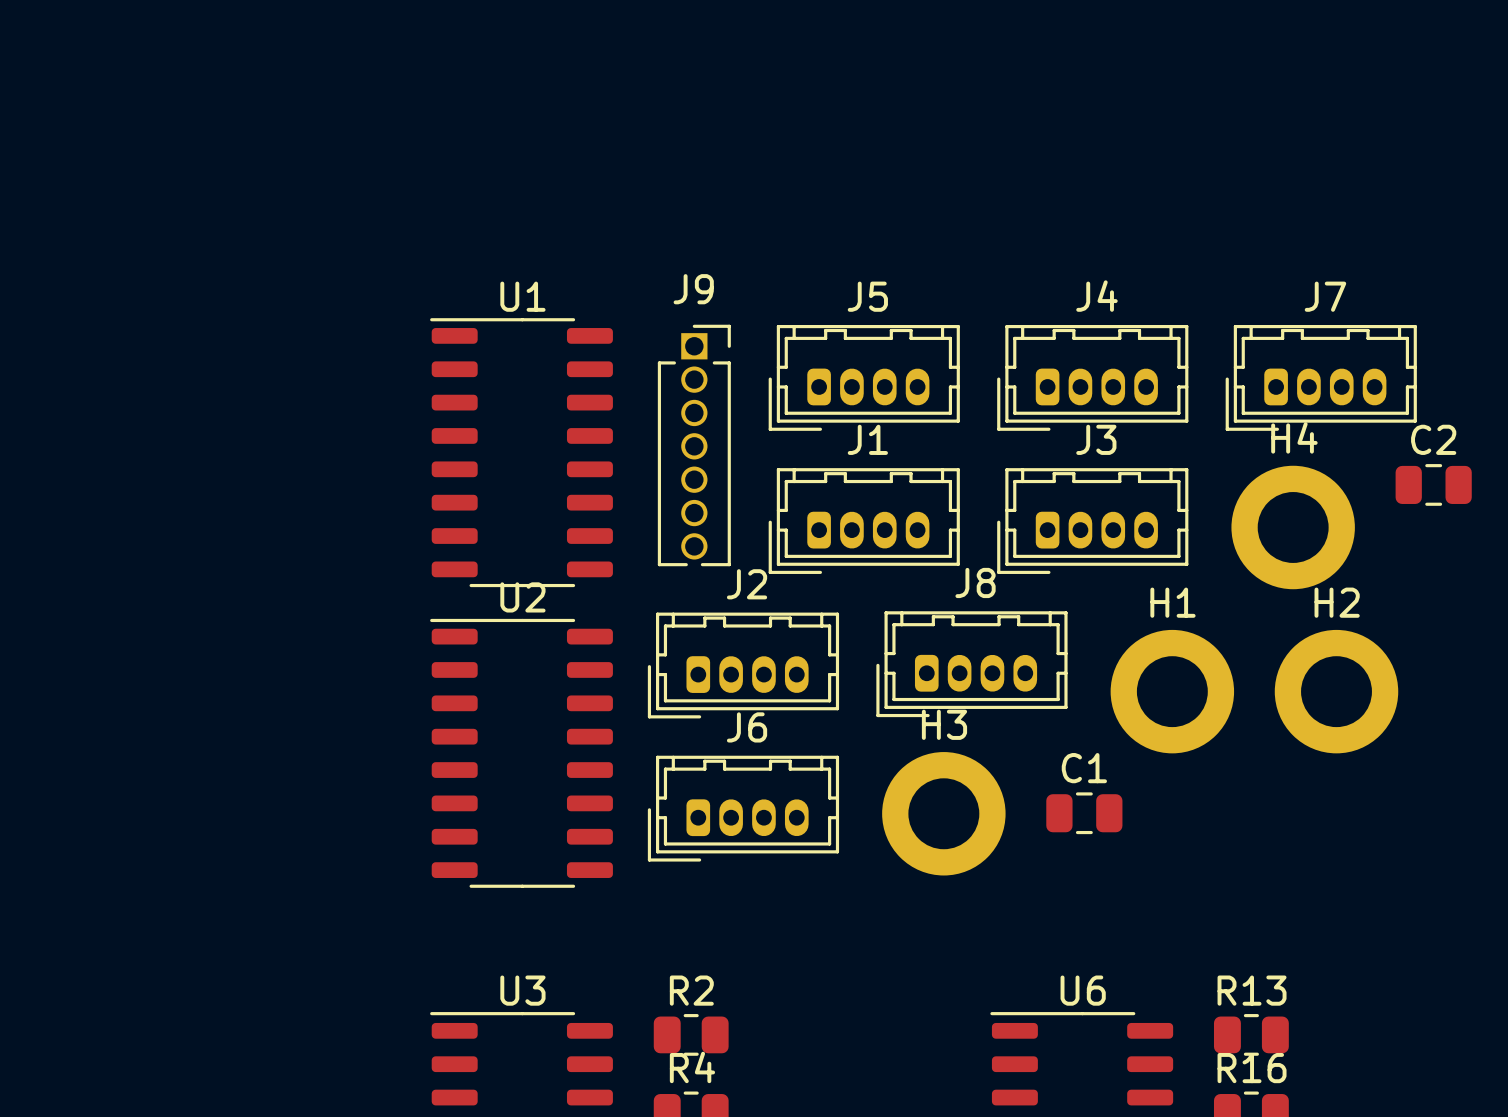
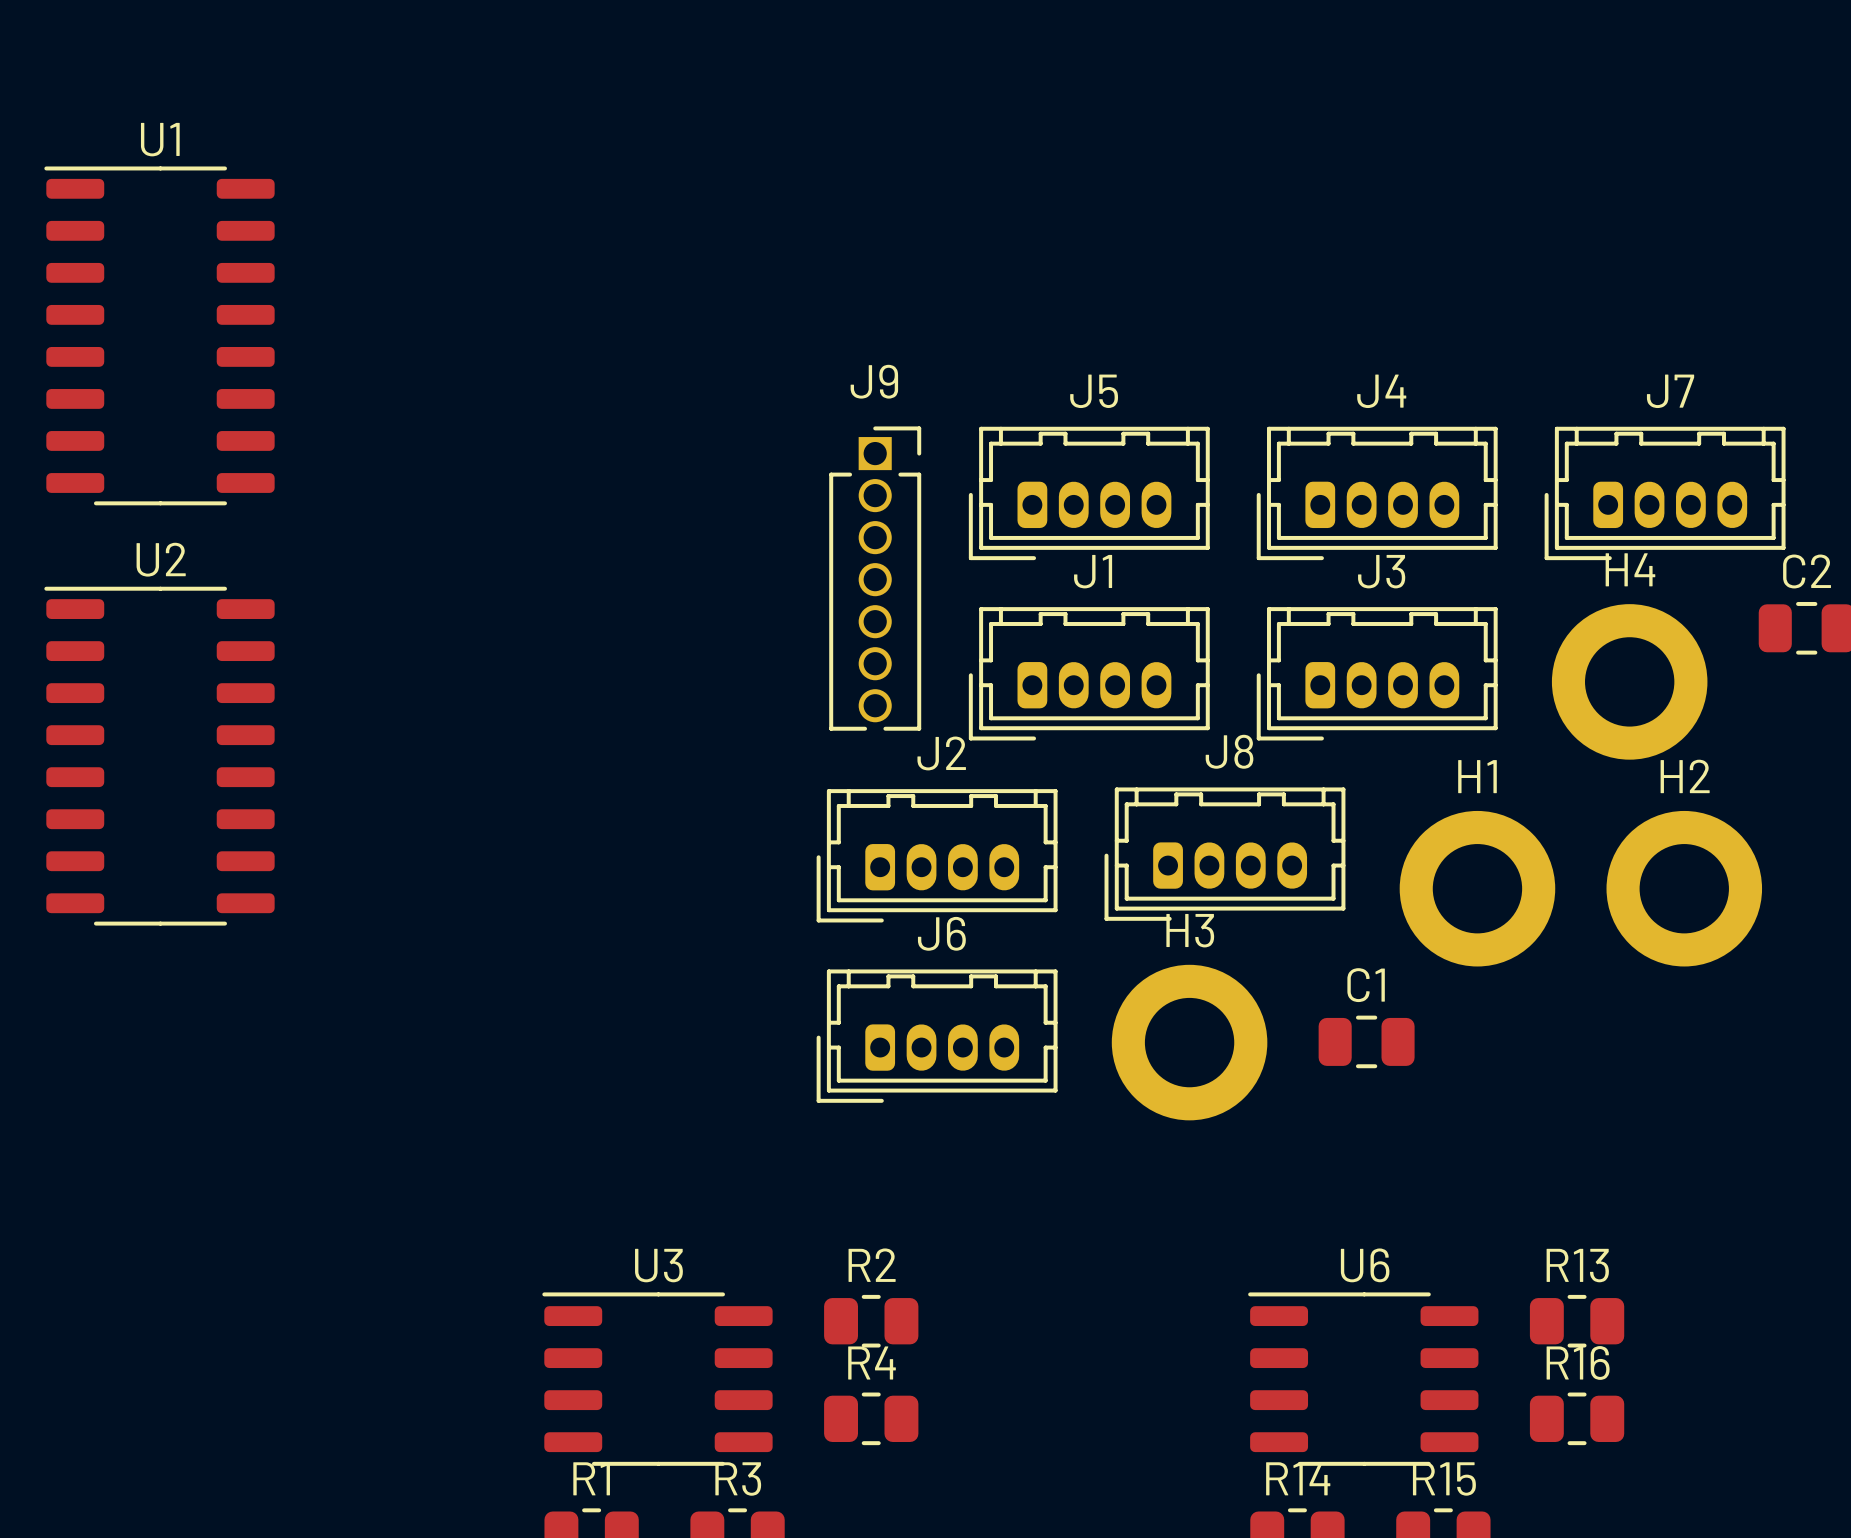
U1 position: (521, 452) -> (159, 335)
U2 position: (521, 753) -> (159, 756)

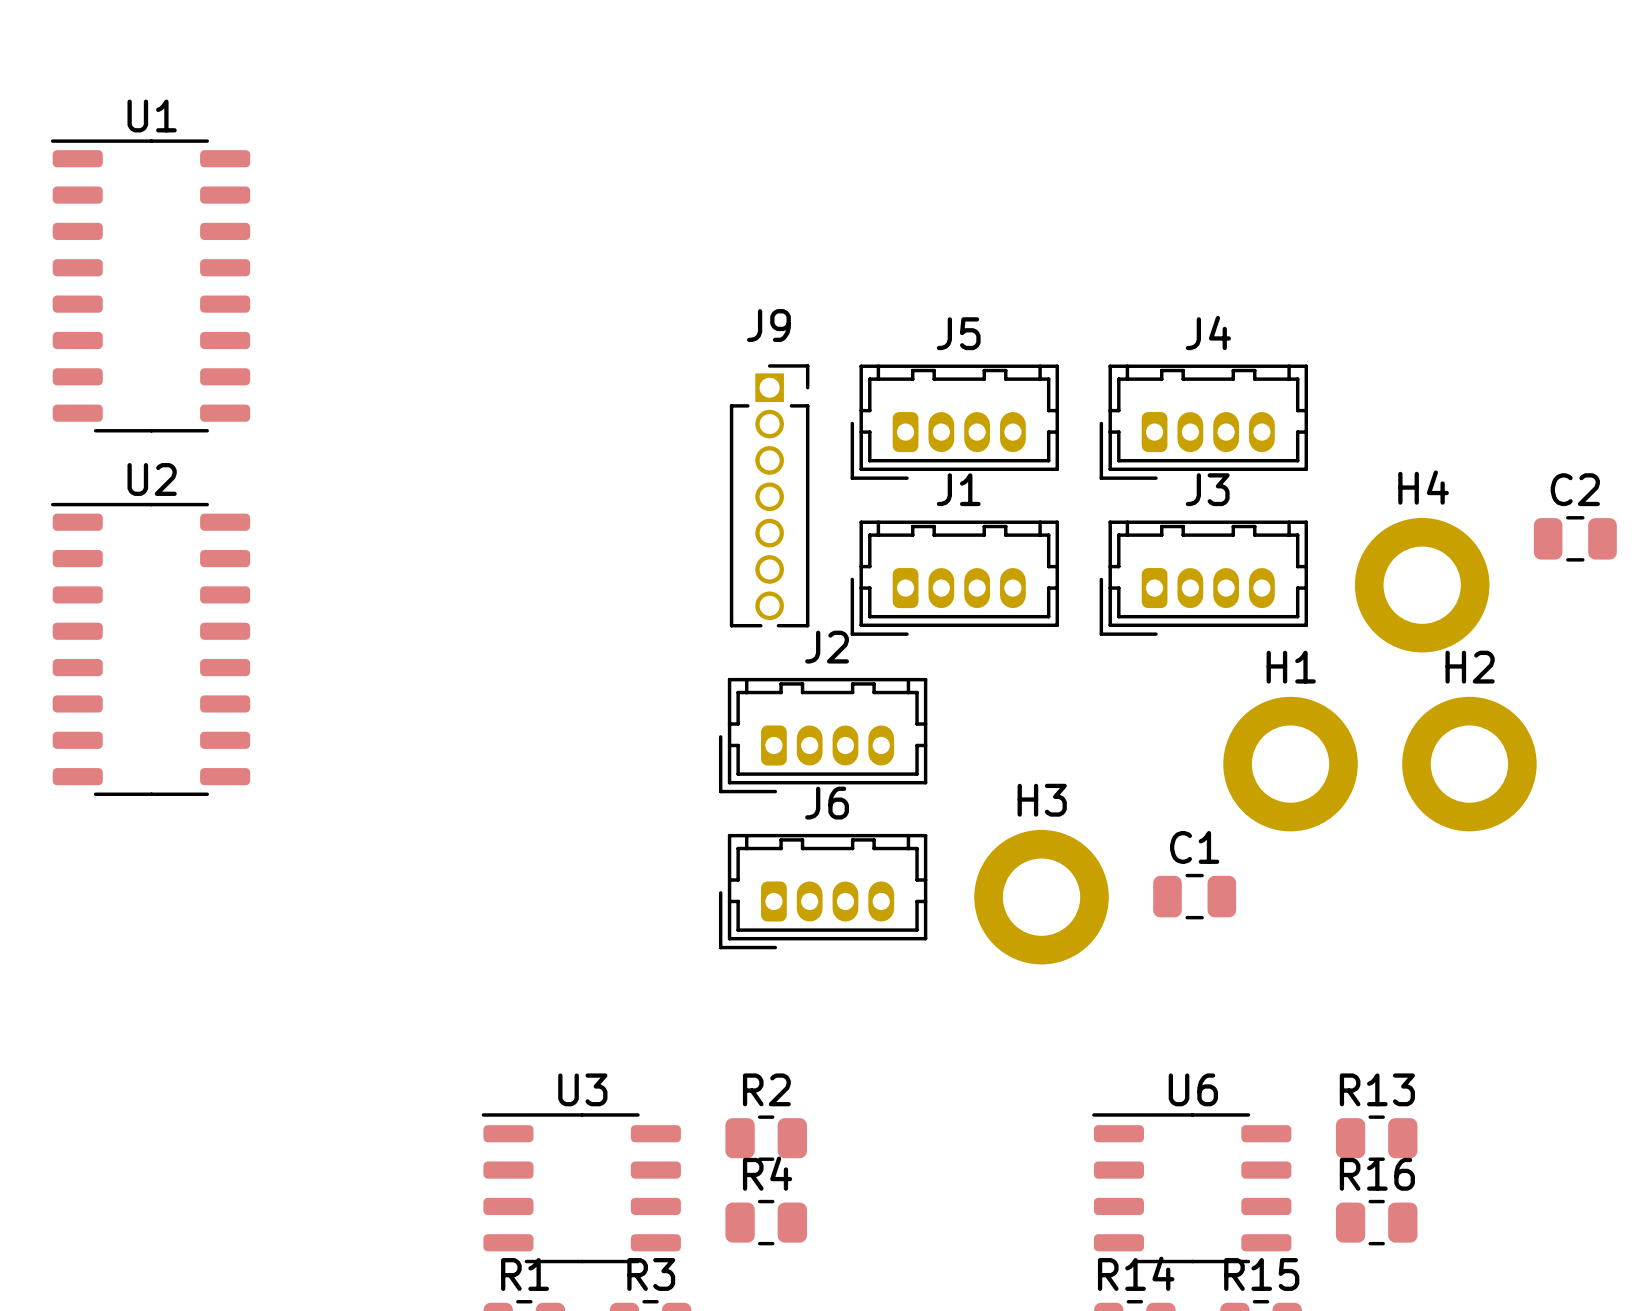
J7: (1665, 493) -> none
J8: (1224, 854) -> none

